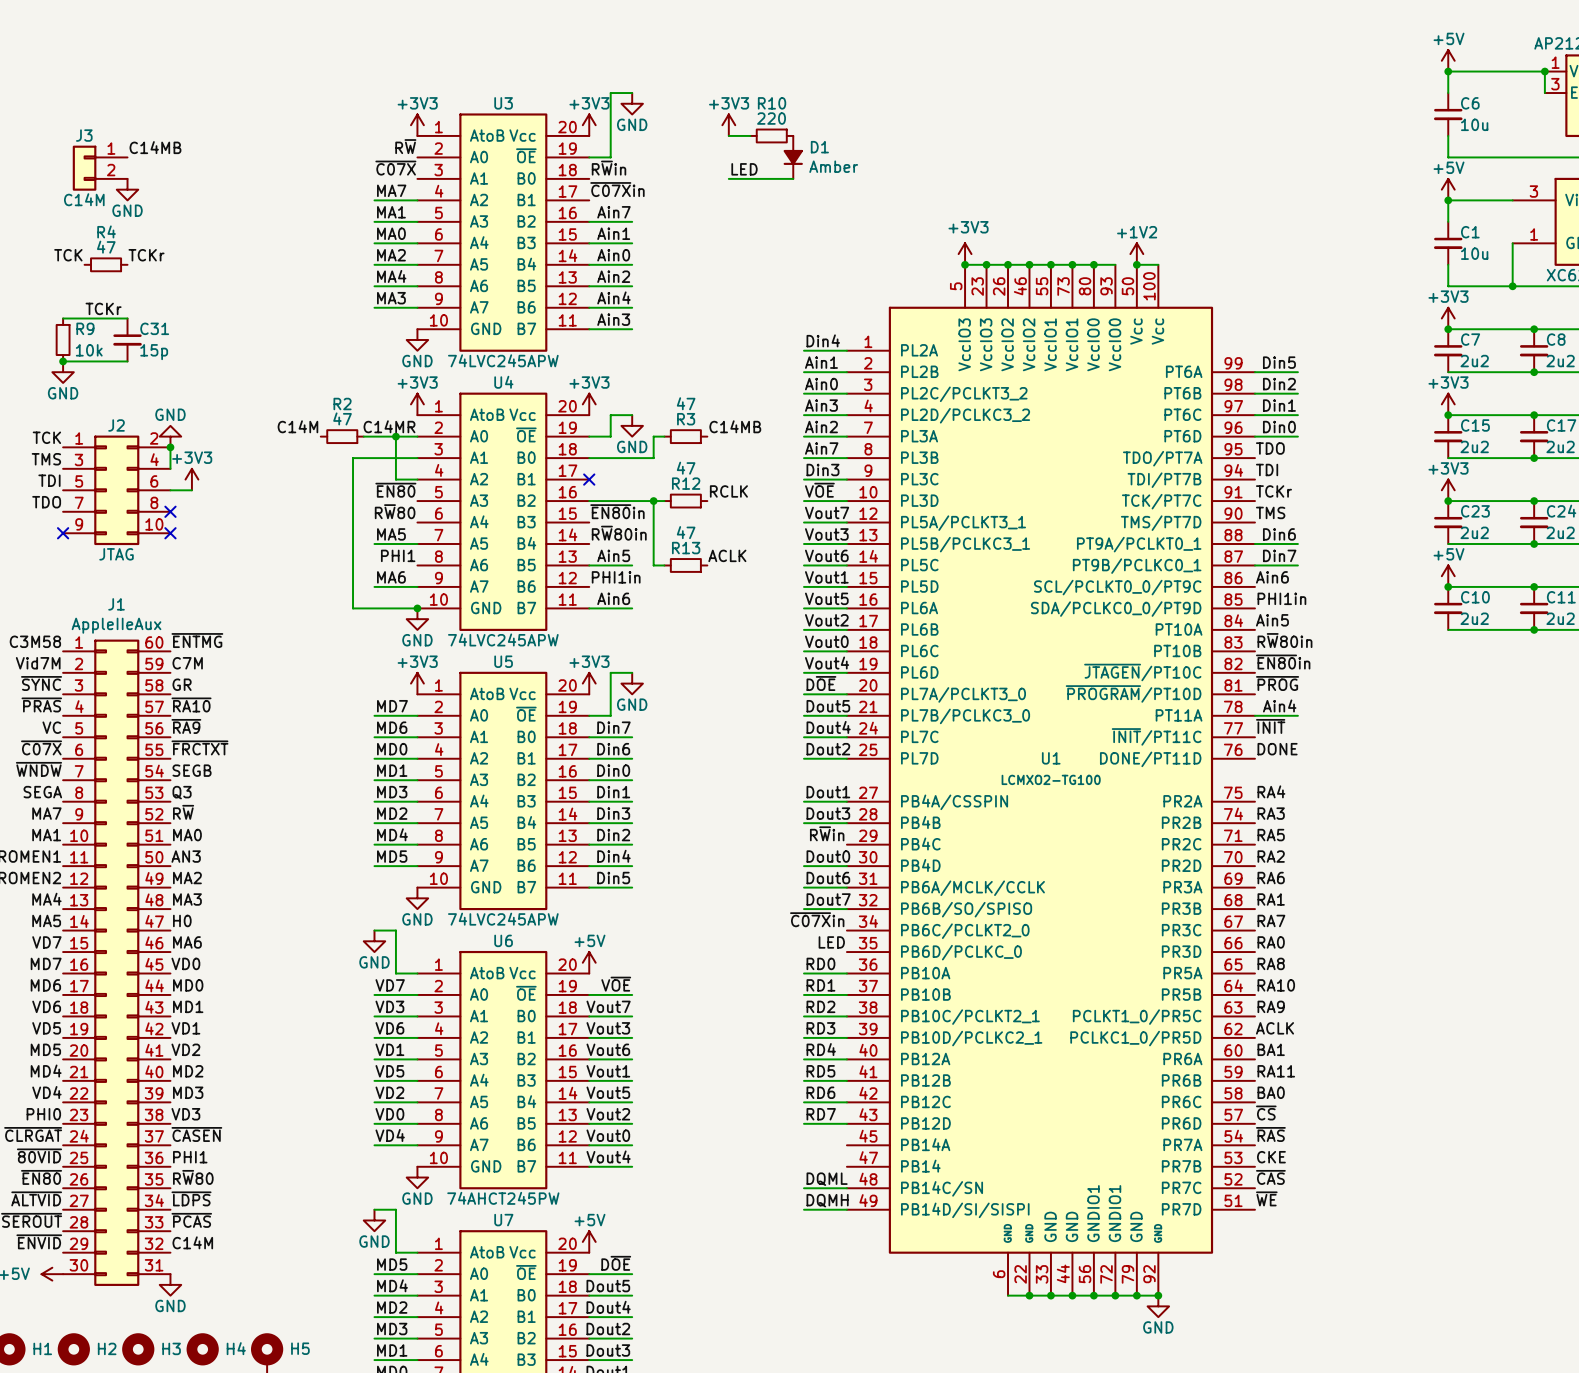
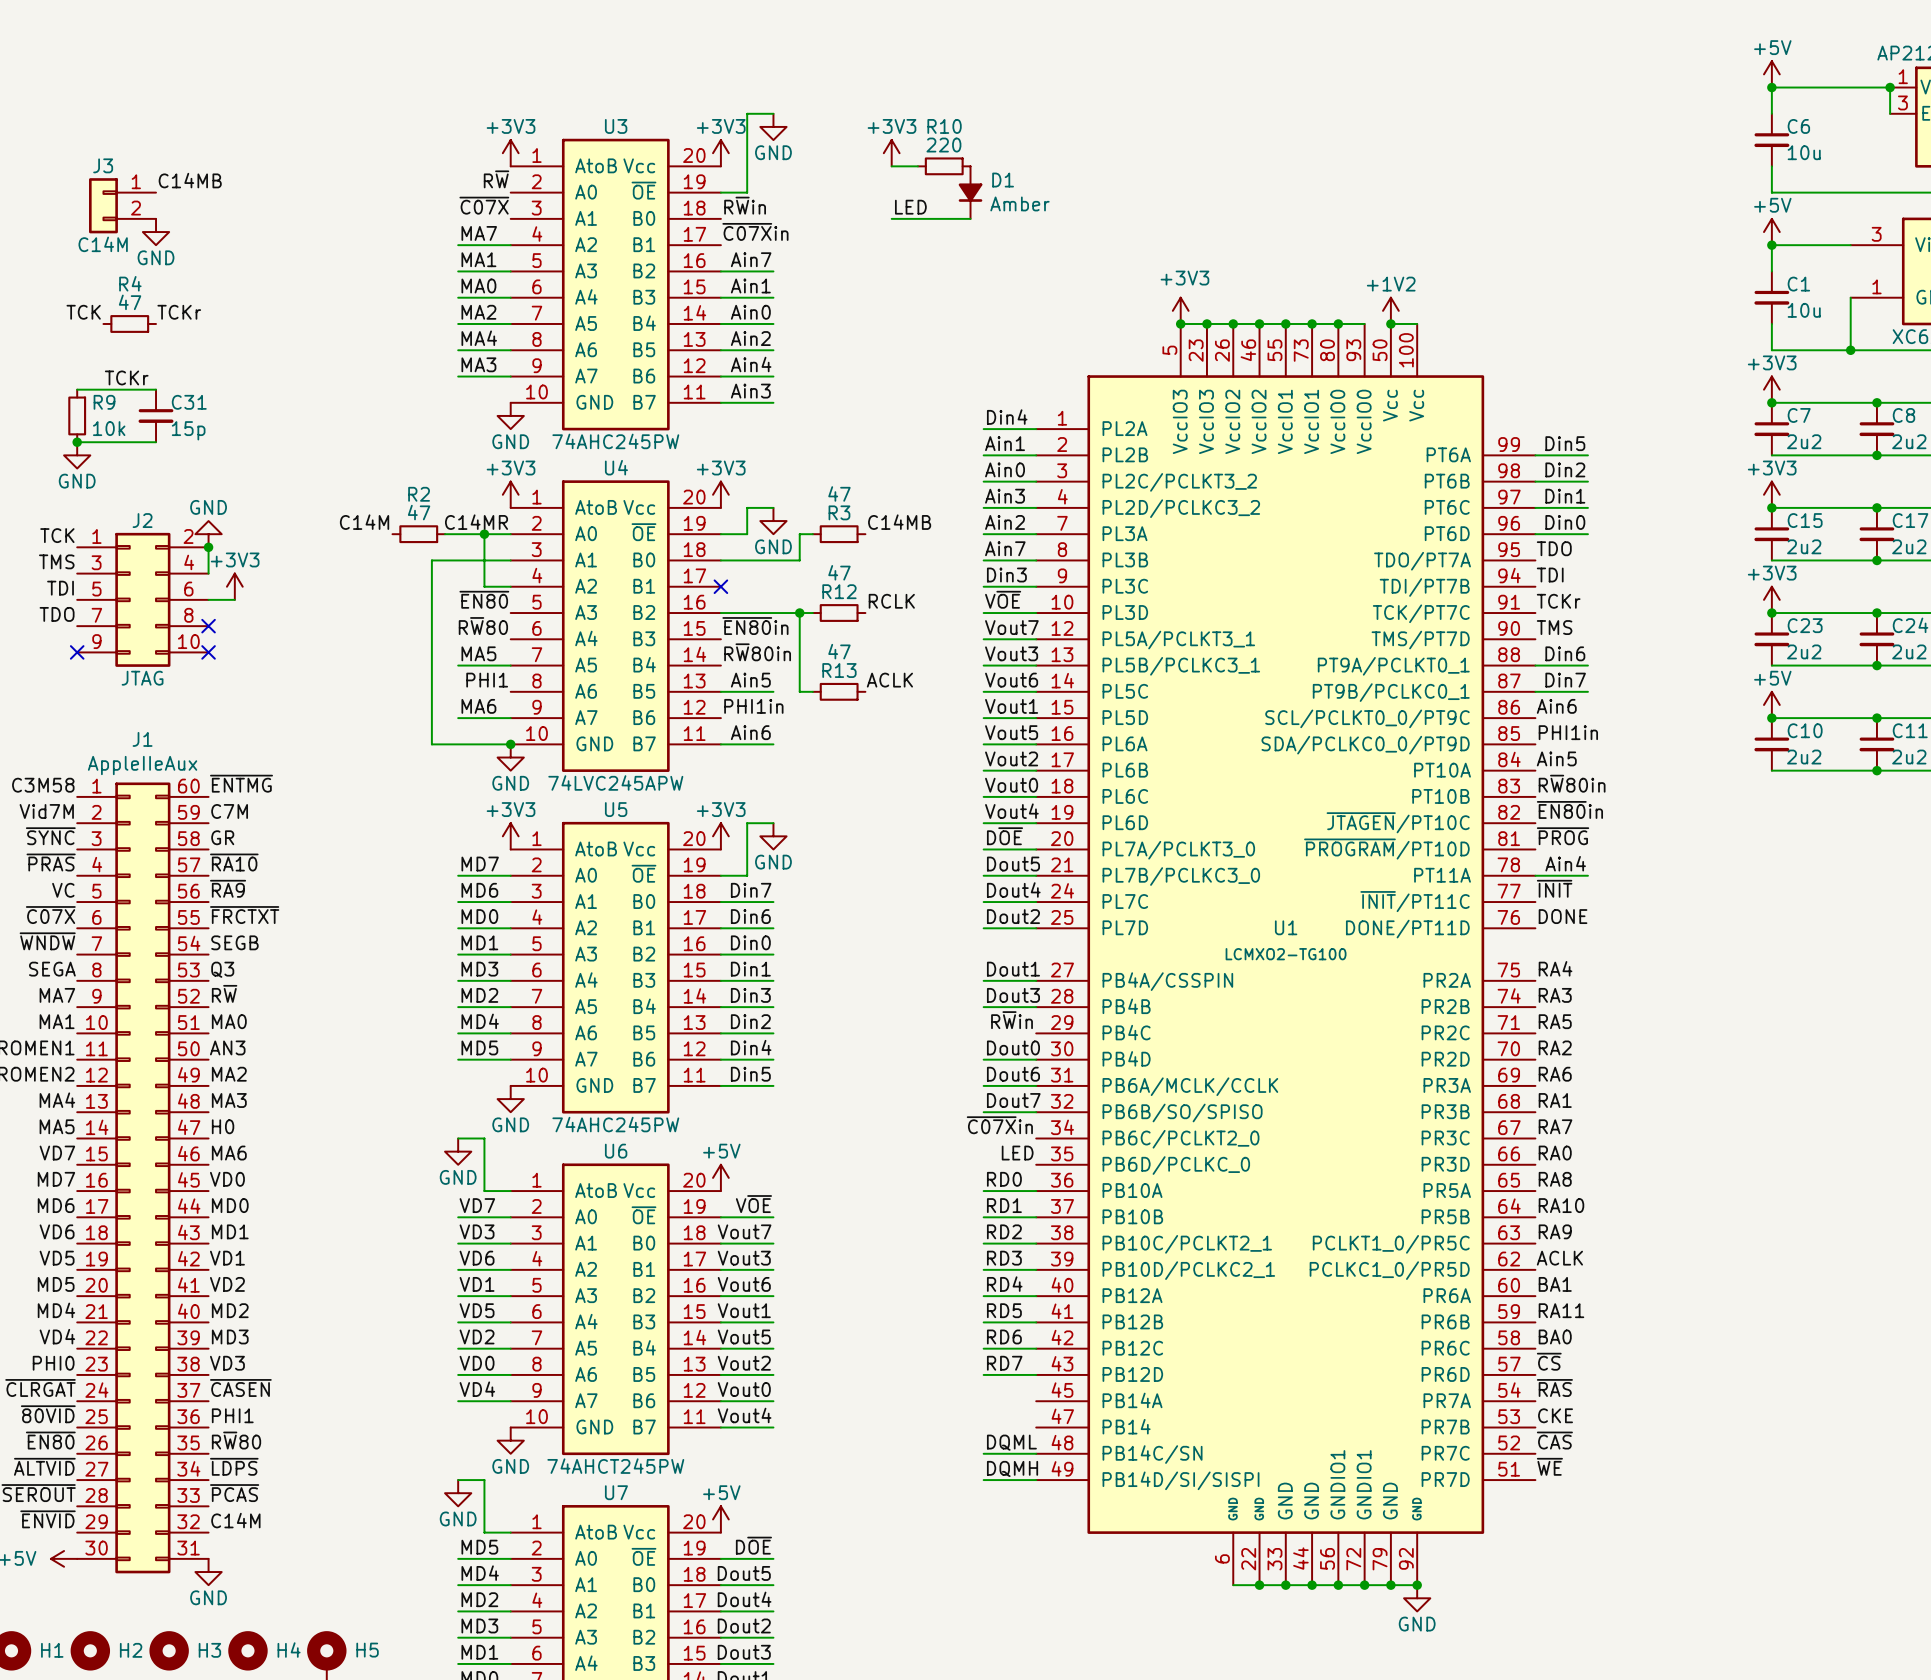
U3 value: 74LVC245APW (503, 360) -> 74AHC245PW (615, 441)
U5 value: 74LVC245APW (503, 919) -> 74AHC245PW (615, 1124)

